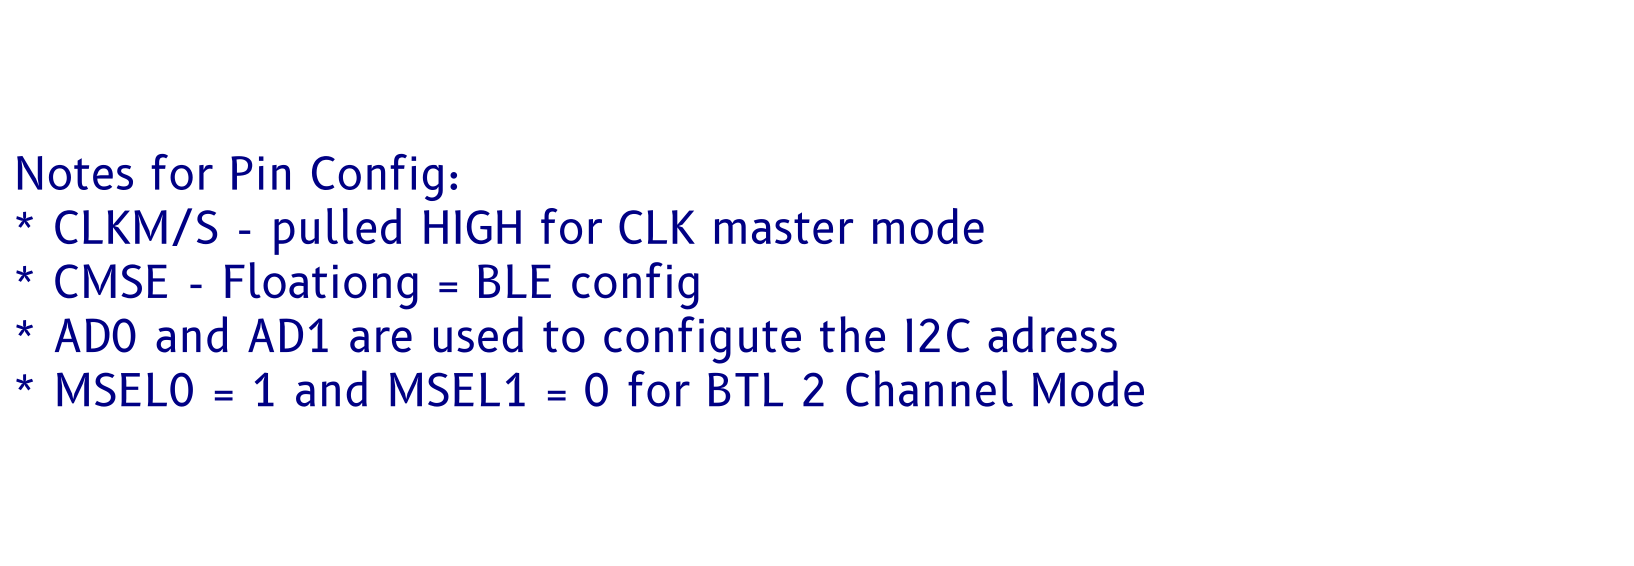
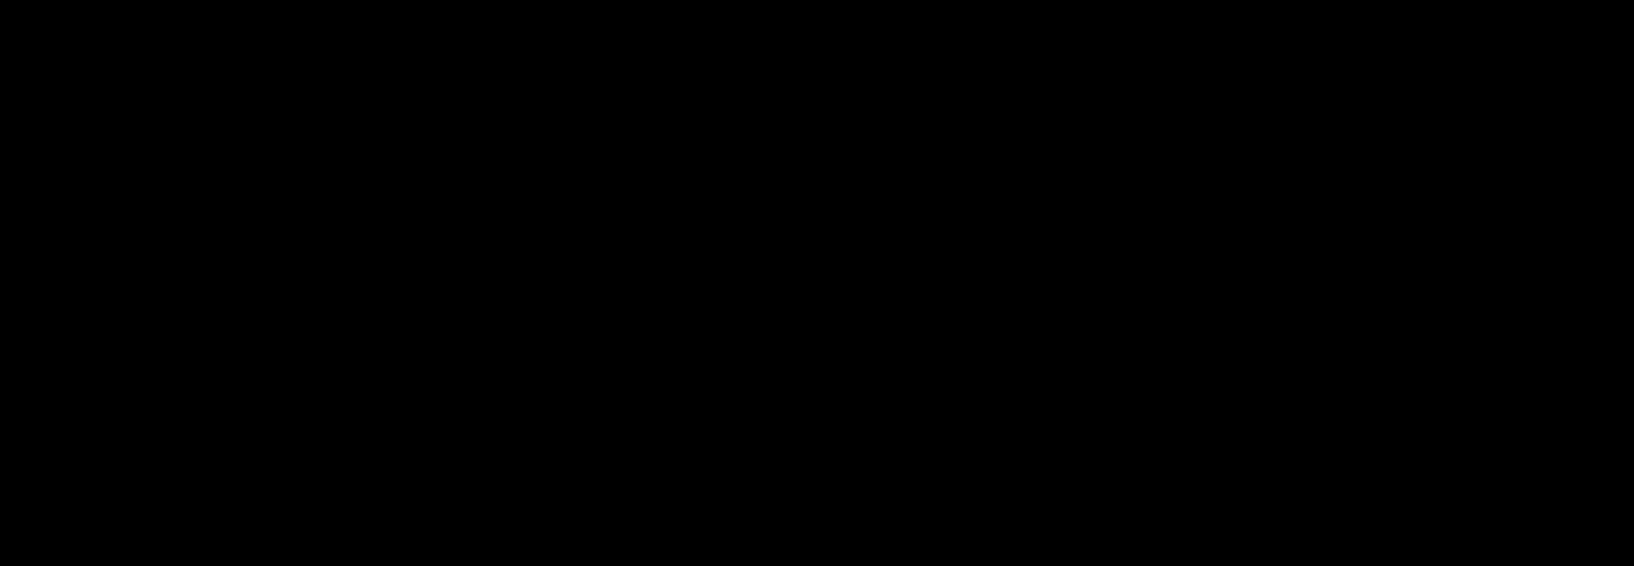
text: Notes for Pin Config: (237, 177) -> none
text: * CLKM/S - pulled HIGH for CLK master mode (499, 231) -> none
text: * CMSE - Floationg = BLE config (357, 285) -> none
text: * AD0 and AD1 are used to configute the I2C adress (566, 339) -> none
text: * MSEL0 = 1 and MSEL1 = 0 for BTL 2 Channel Mode (580, 388) -> none

